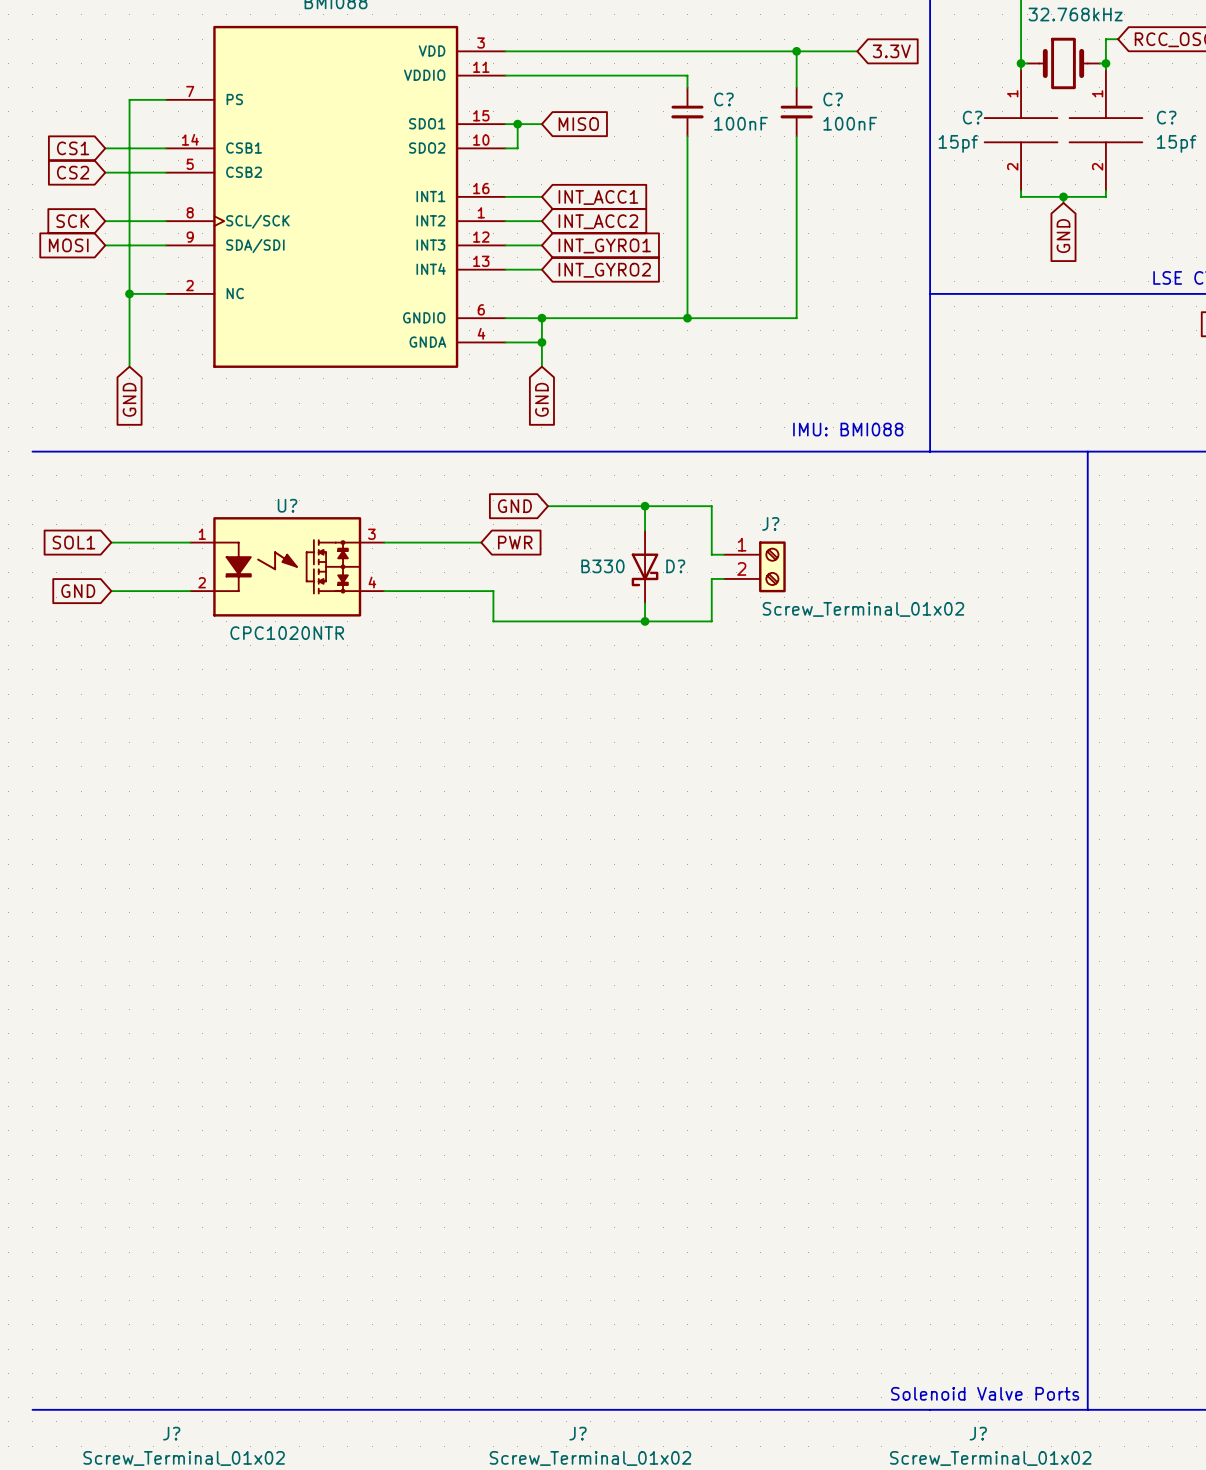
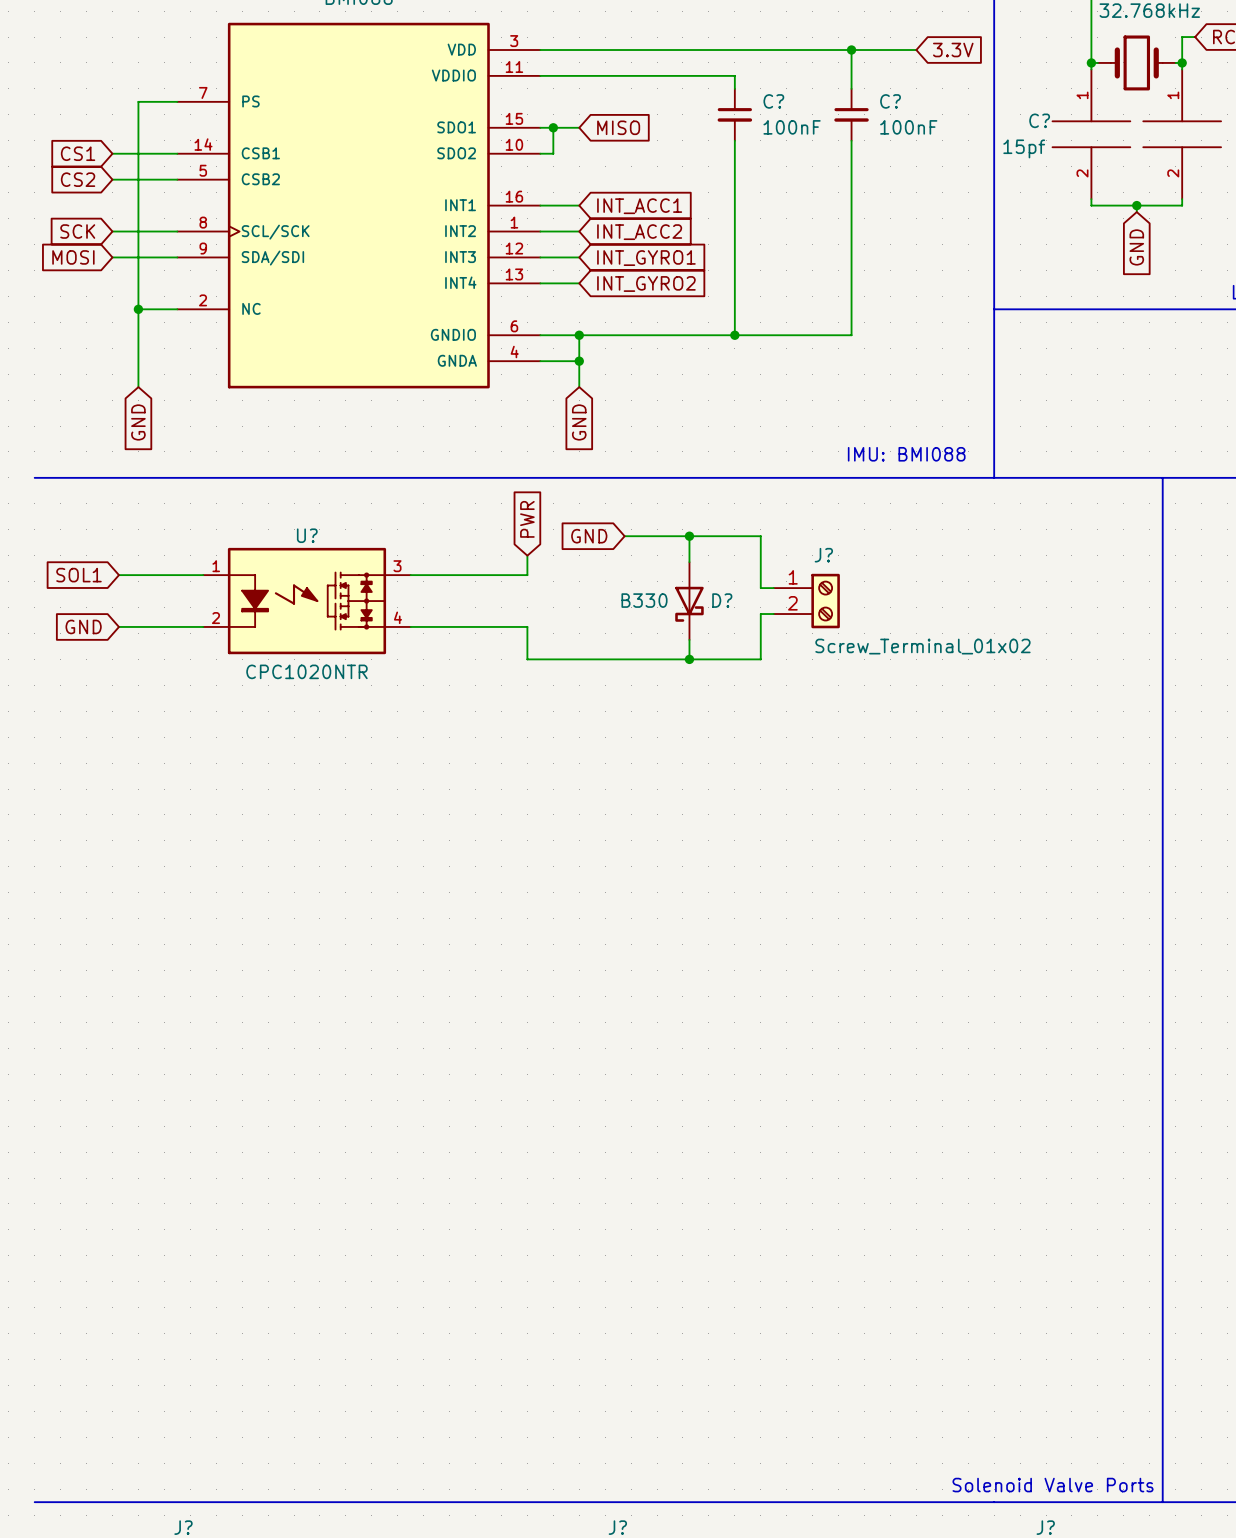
global label position: GND (514, 506) -> GND (589, 536)
wire: (548, 506) (584, 506) -> none
wire: none -> (527, 555) (527, 575) (514, 575)
global label rotation: 0° (515, 542) -> 90° counterclockwise (527, 519)

